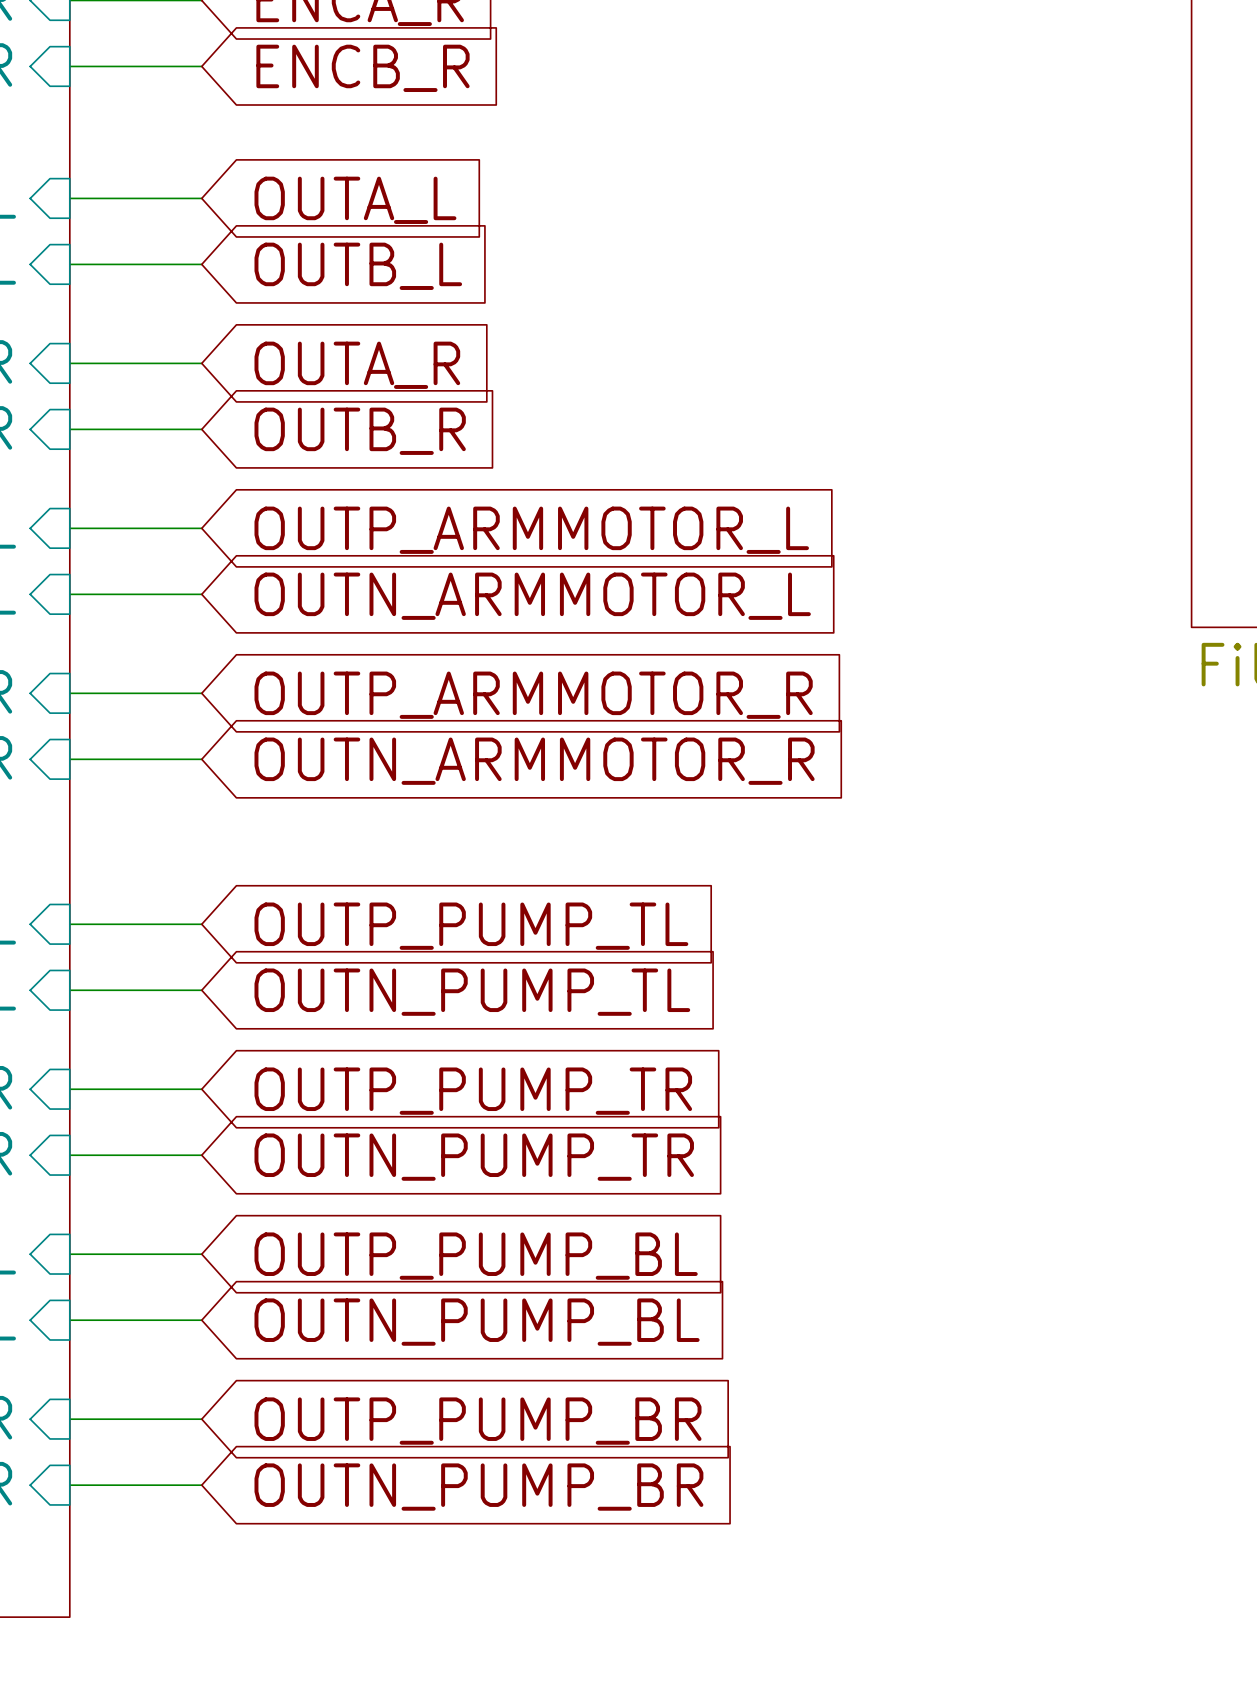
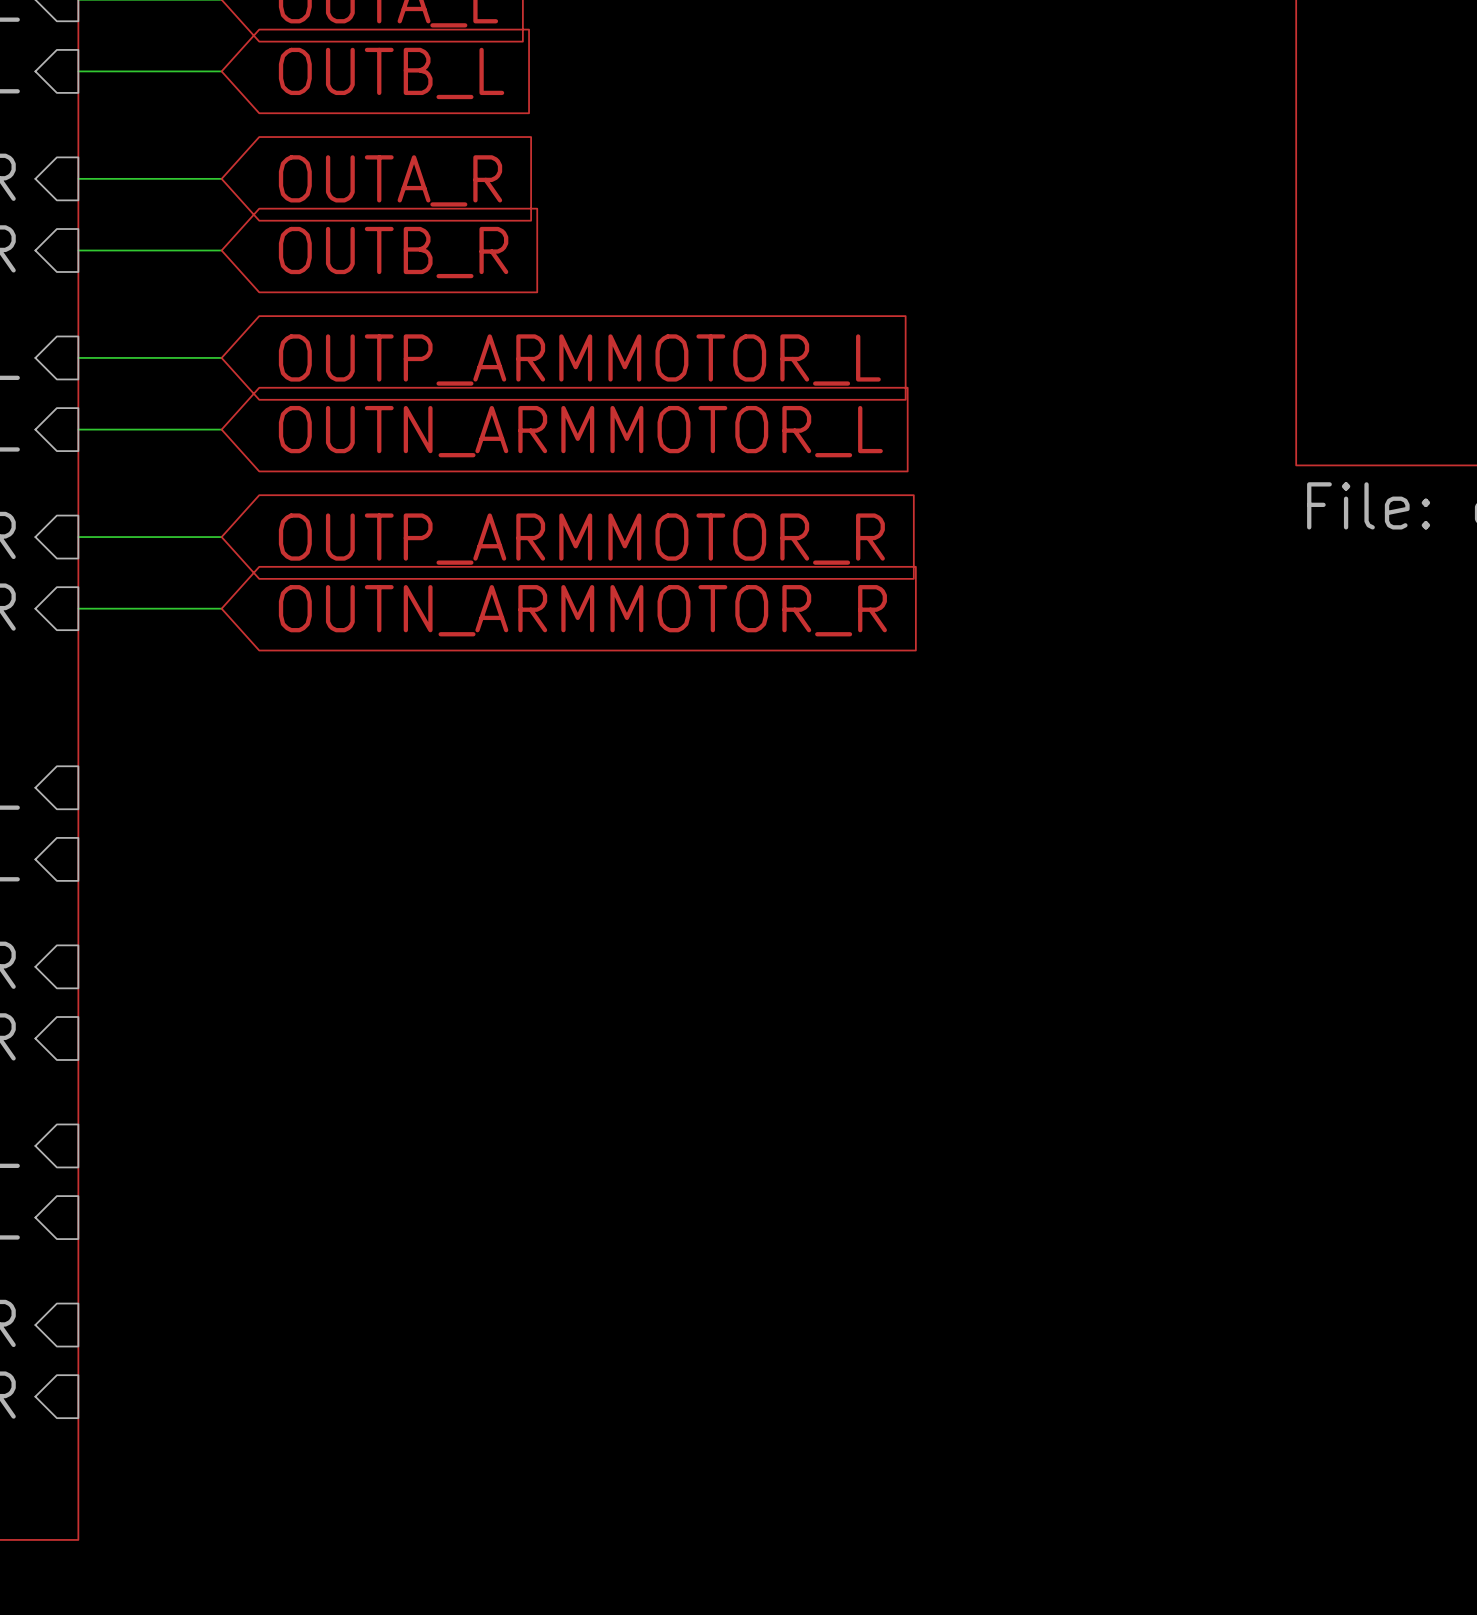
wire: (69, 924) (201, 924) -> none
global label: OUTP_PUMP_TL (471, 926) -> none
wire: (69, 990) (201, 990) -> none
global label: OUTN_PUMP_TL (472, 992) -> none
wire: (69, 1089) (201, 1089) -> none
global label: OUTP_PUMP_TR (473, 1091) -> none
wire: (69, 1155) (201, 1155) -> none
global label: OUTN_PUMP_TR (474, 1157) -> none
wire: (69, 1254) (201, 1254) -> none
global label: OUTP_PUMP_BL (476, 1256) -> none
wire: (69, 1320) (201, 1320) -> none
global label: OUTN_PUMP_BL (477, 1322) -> none
wire: (69, 1419) (201, 1419) -> none
global label: OUTP_PUMP_BR (477, 1421) -> none
wire: (69, 1485) (201, 1485) -> none
global label: OUTN_PUMP_BR (478, 1487) -> none

